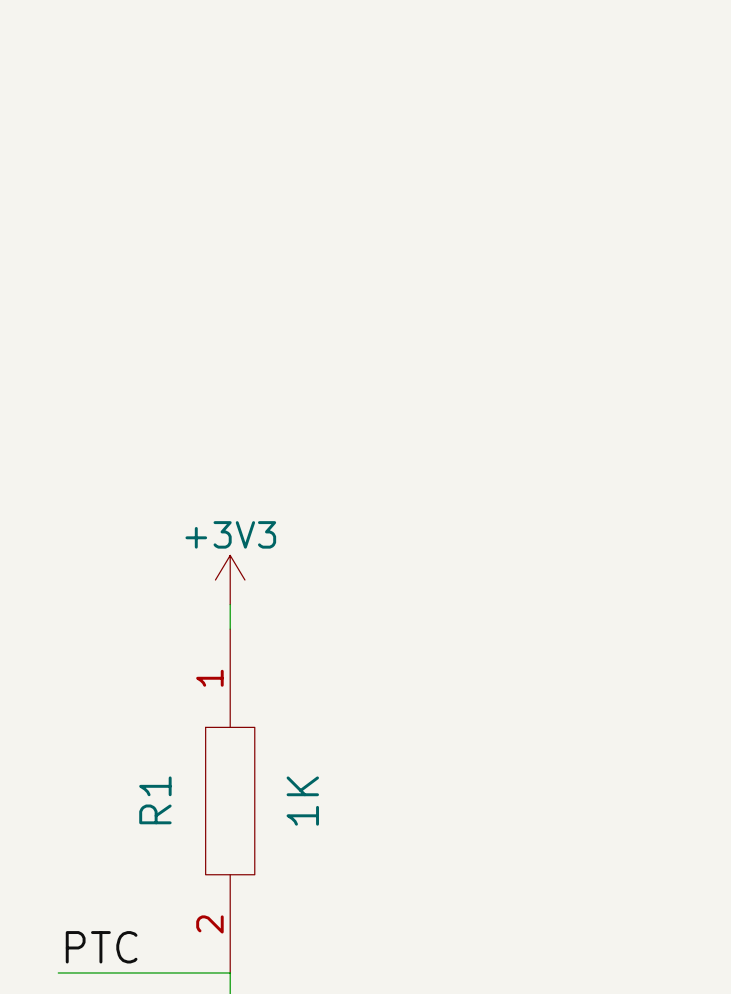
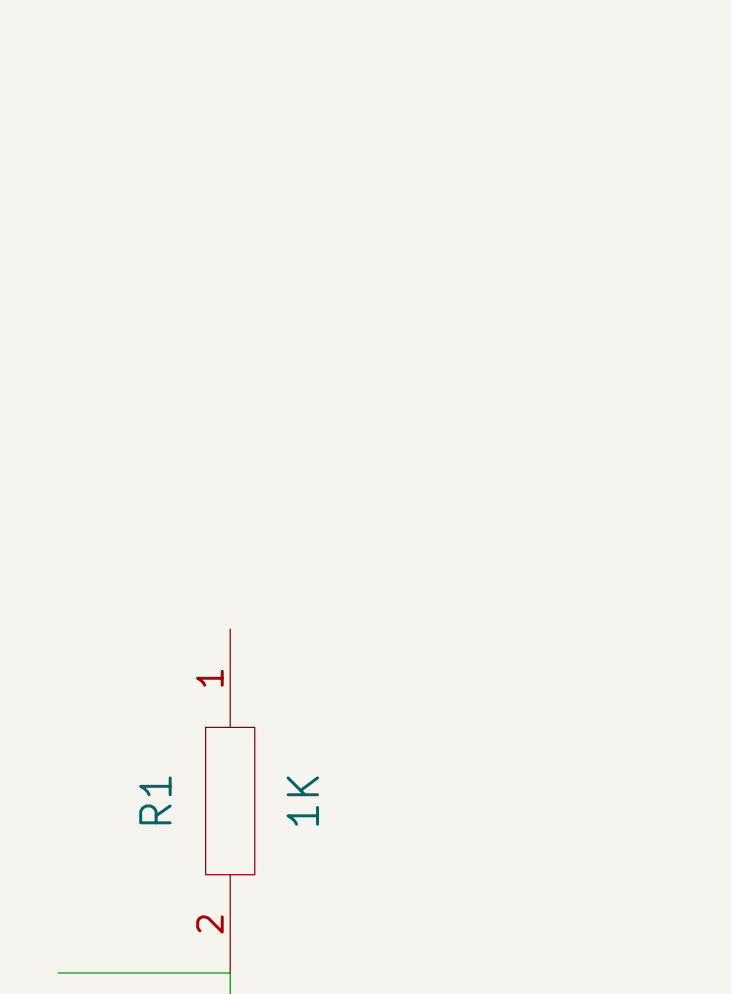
power symbol: +3V3 (230, 580) -> none
wire: (230, 604) (230, 629) -> none
label: PTC (101, 947) -> none

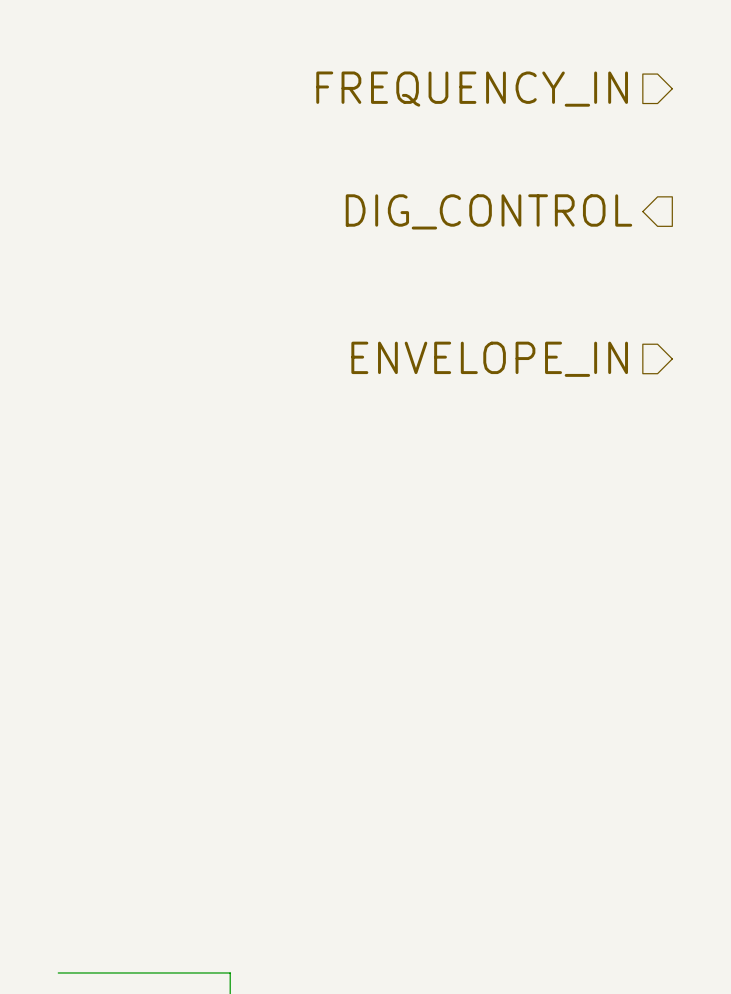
hierarchical label: none -> FREQUENCY_IN (472, 89)
hierarchical label: none -> DIG_CONTROL (488, 211)
hierarchical label: none -> ENVELOPE_IN (489, 359)
R1: 1K (230, 801) -> none

